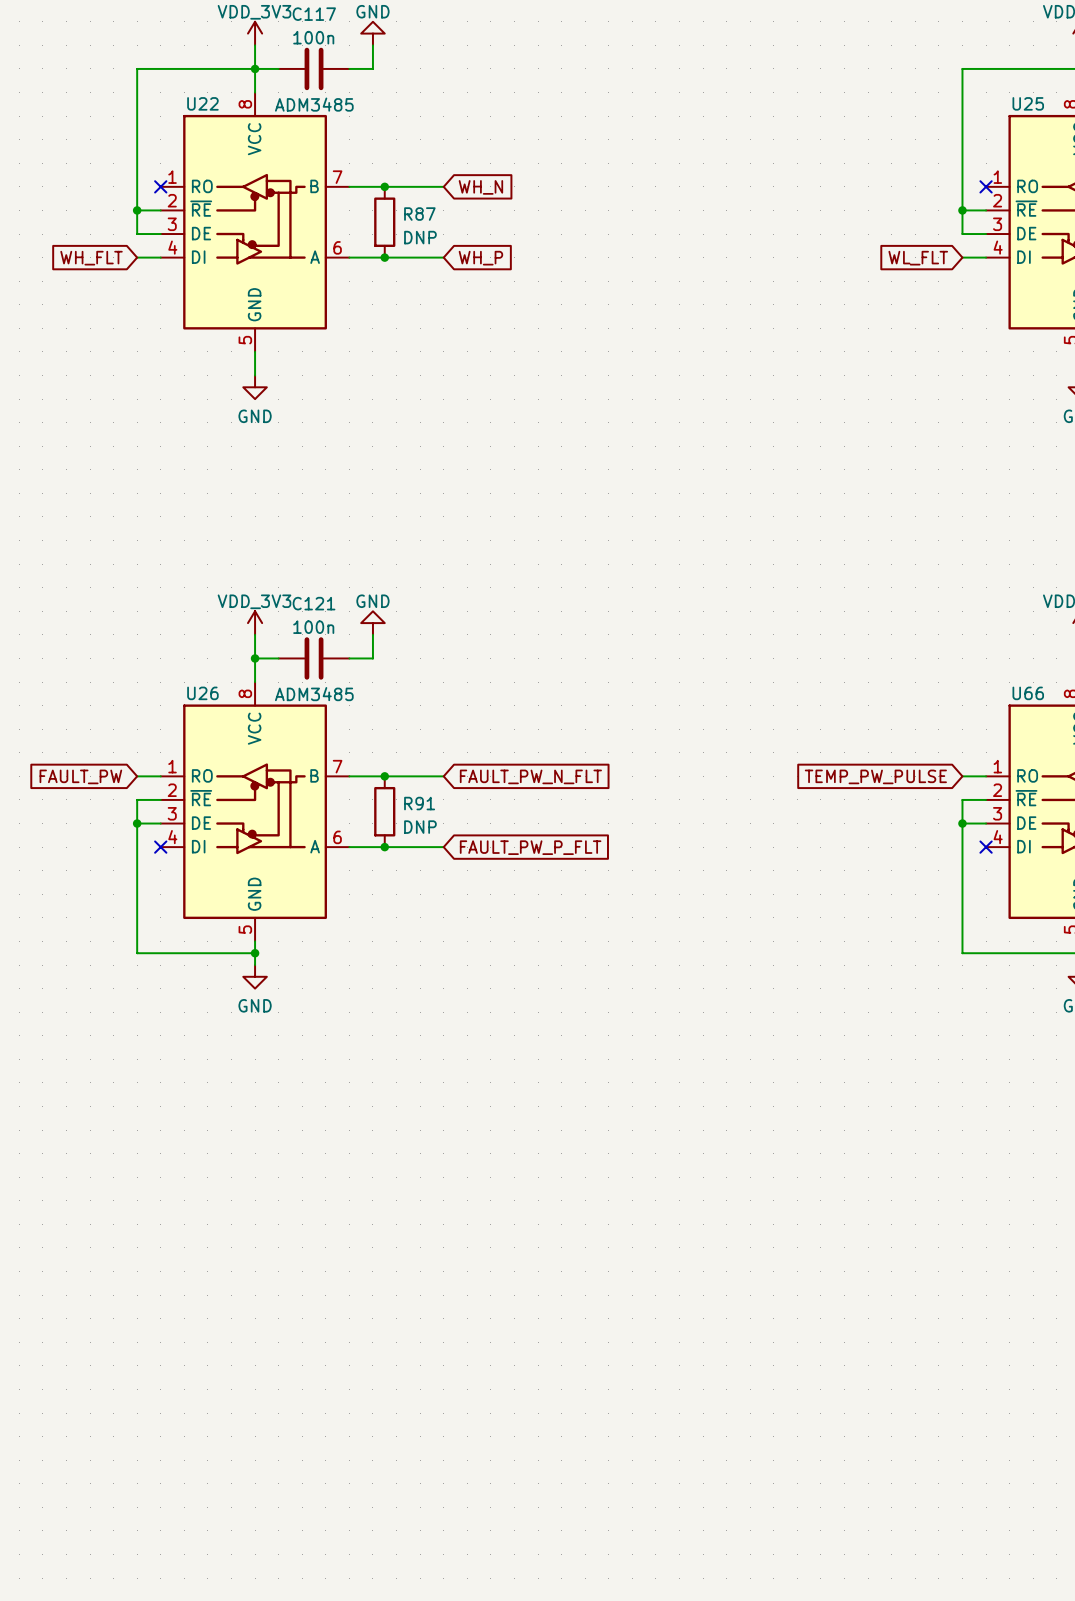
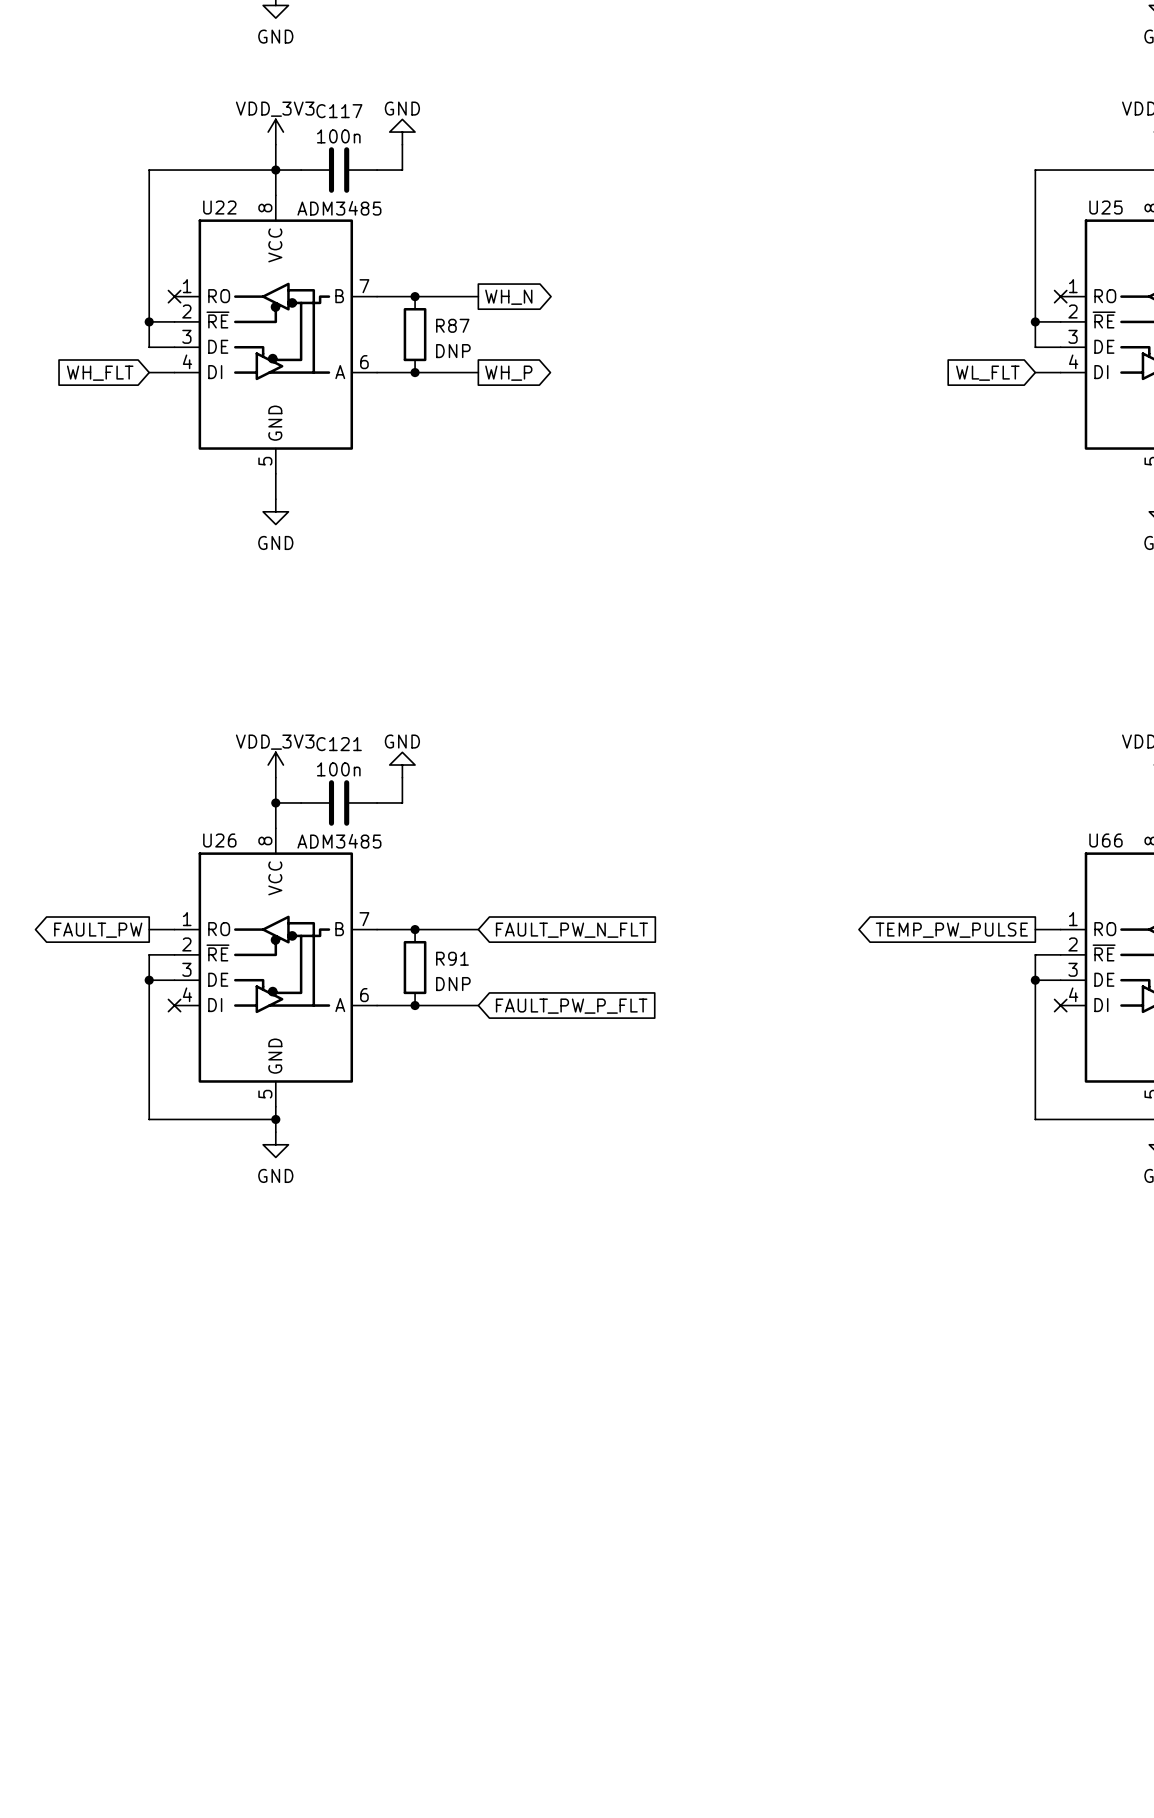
global label shape: input (480, 187) -> output (508, 297)
global label shape: input (480, 258) -> output (508, 373)
global label shape: input (80, 776) -> output (98, 930)
global label shape: input (875, 776) -> output (951, 930)

